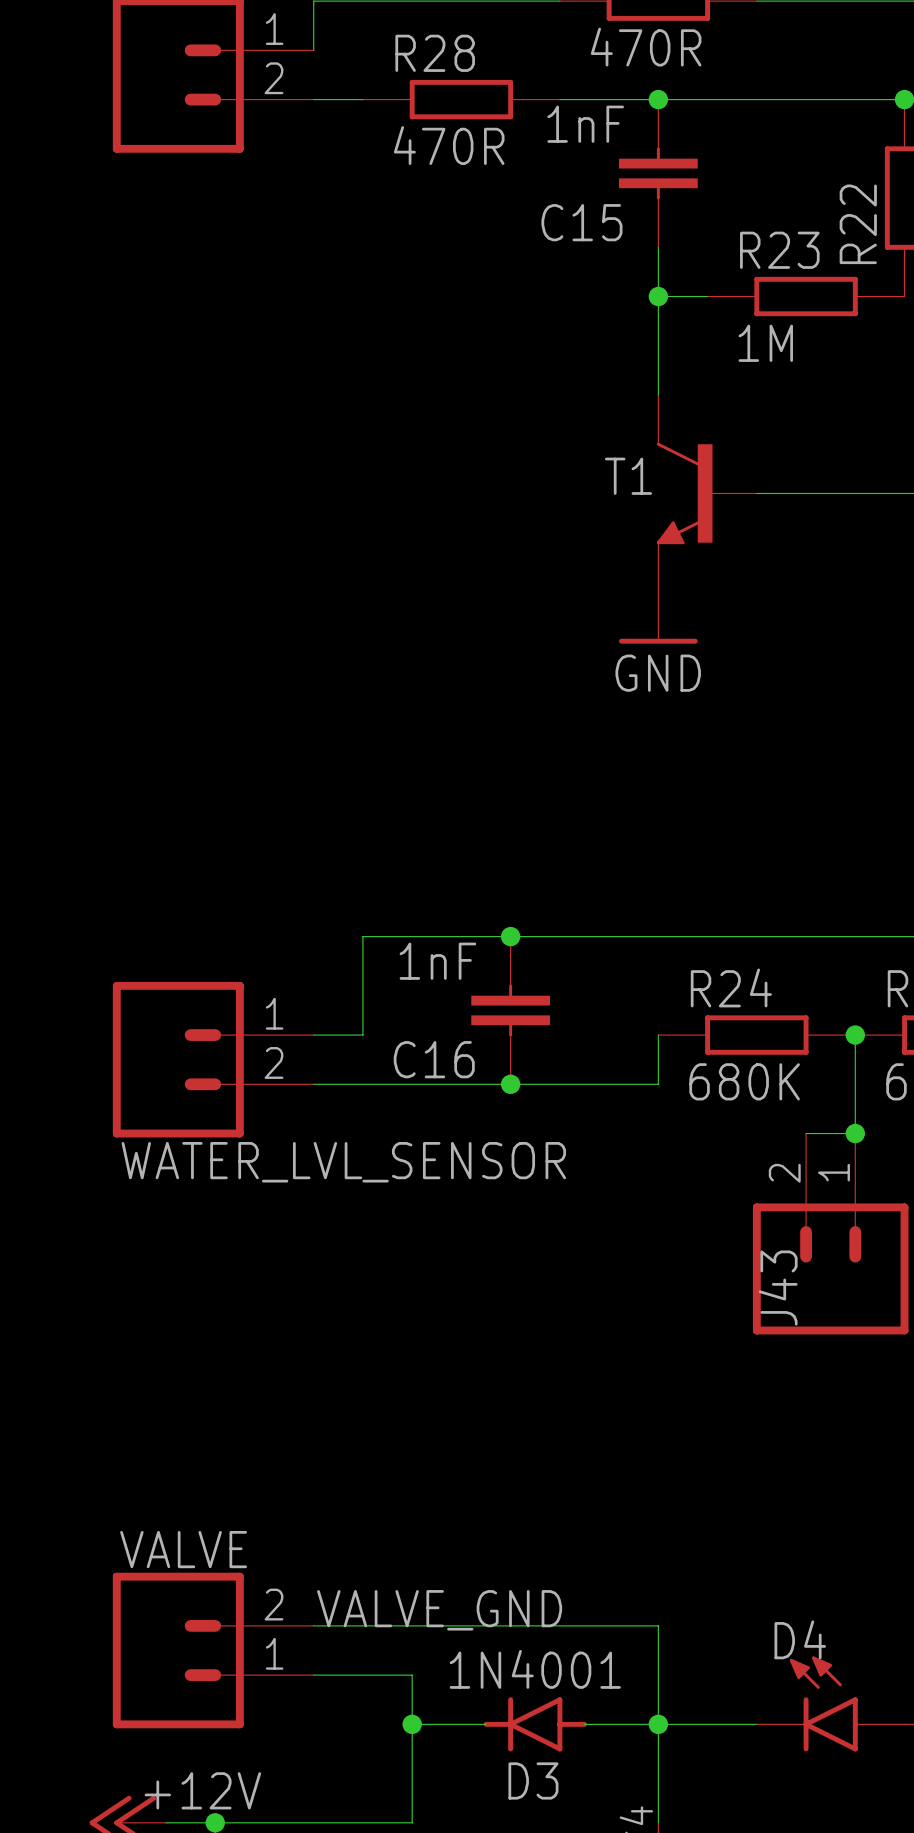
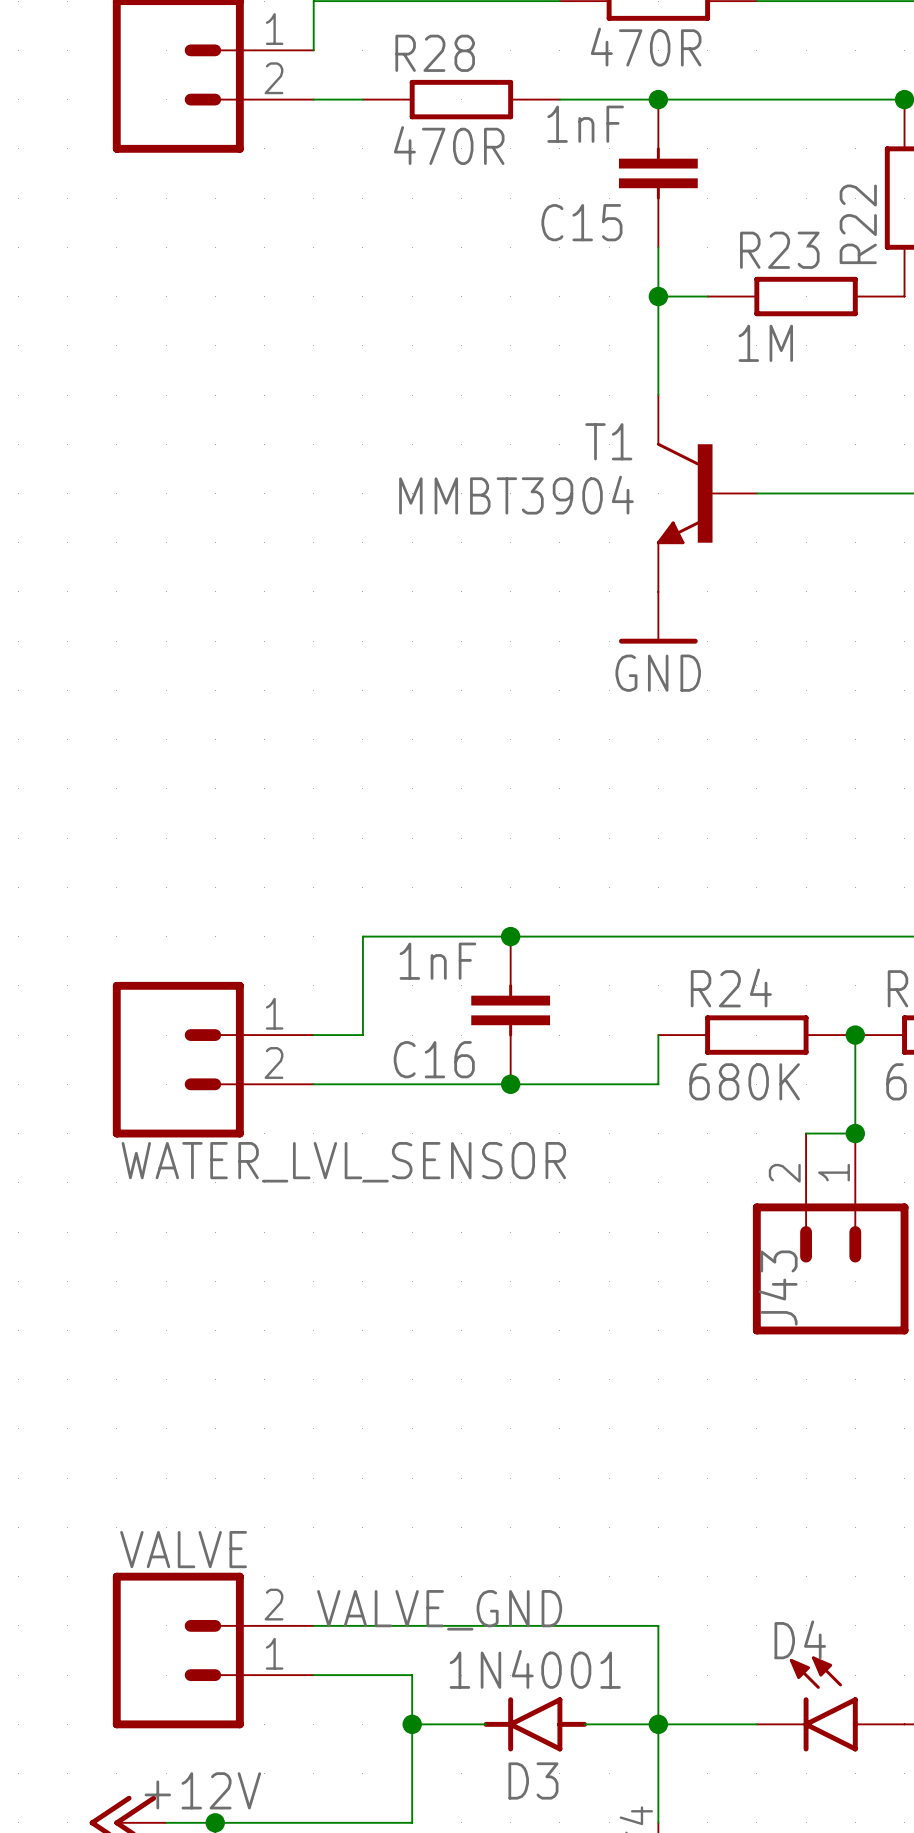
T1 name position: T1 (628, 476) -> T1 (608, 441)
T1 value: none -> MMBT3904 (516, 495)

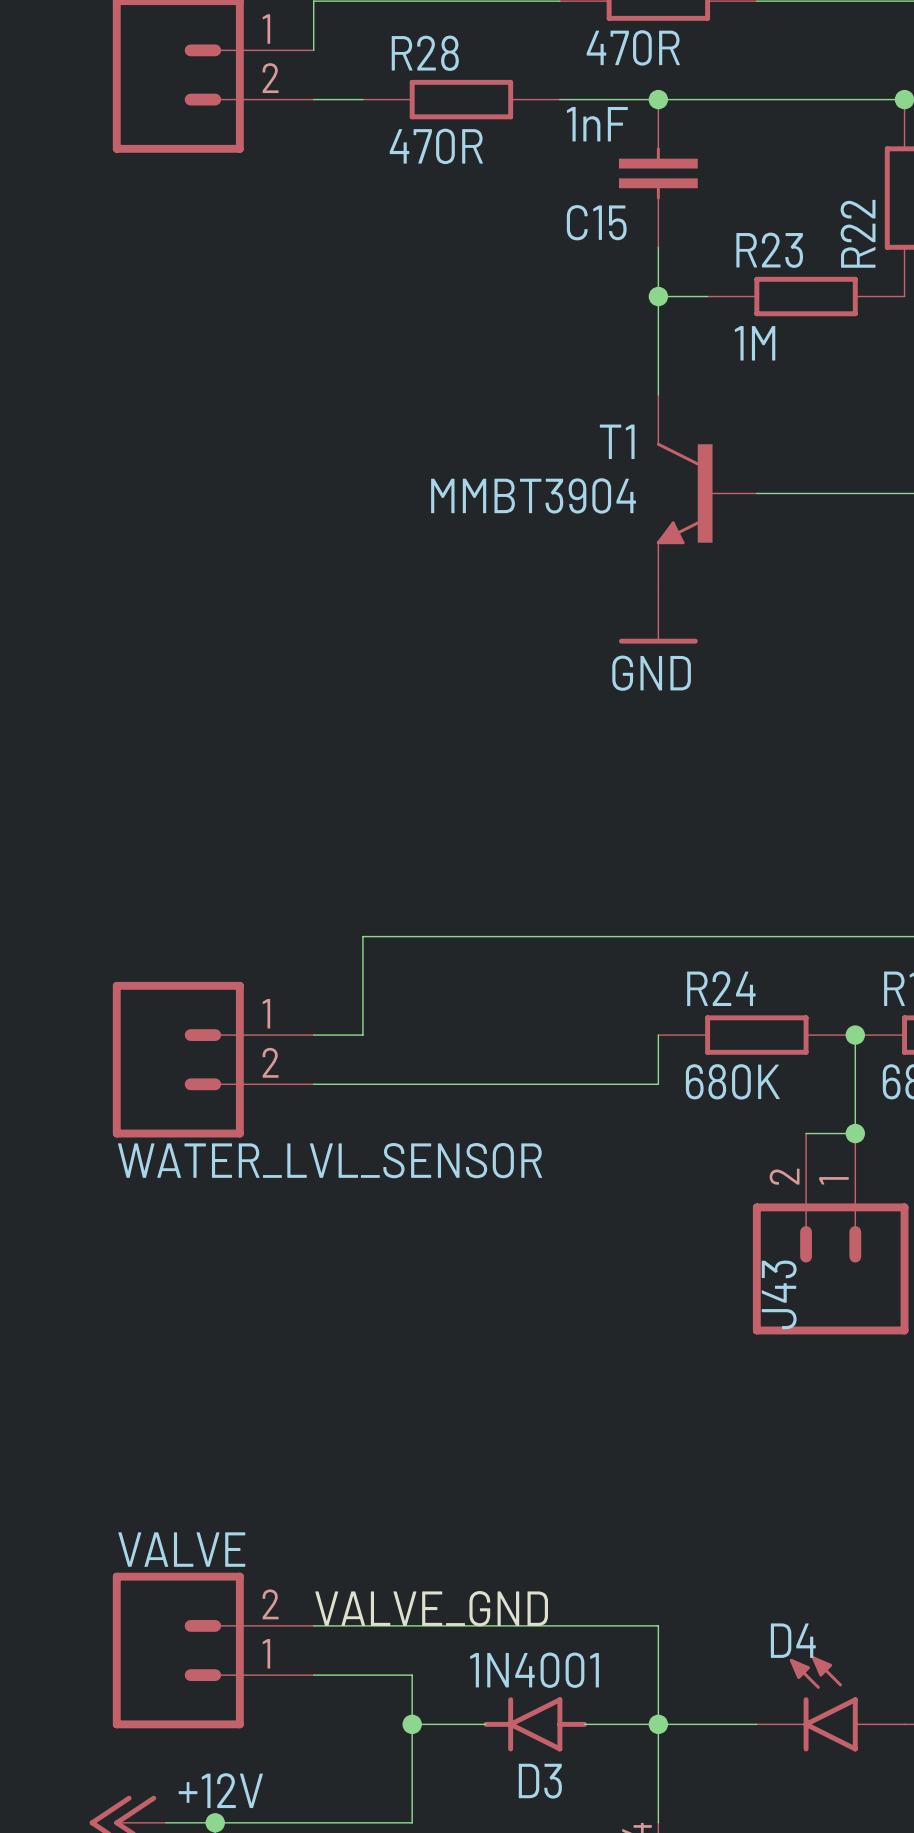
junction: (510, 936) -> none
C16: 1nF (510, 1010) -> none
junction: (510, 1084) -> none

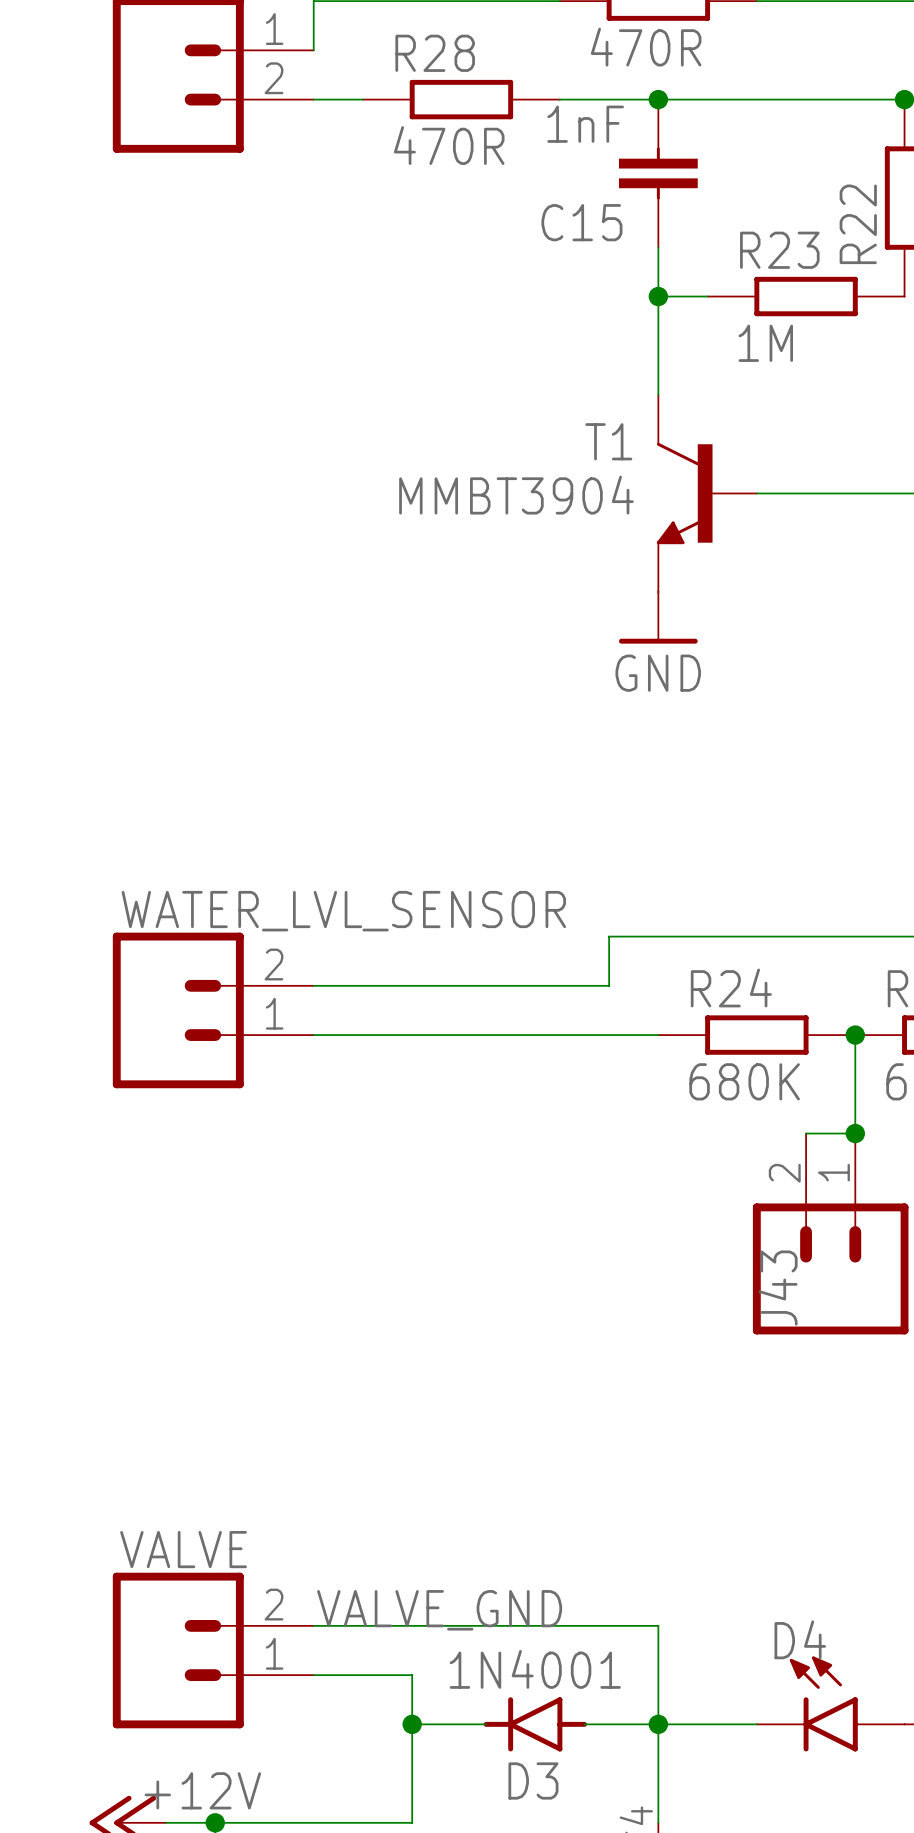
wire: (609, 936) (362, 936) (362, 1035) -> (609, 936) (609, 985) (313, 985)
WATER_LVL_SENSOR: none -> (213, 1010)
wire: (658, 1035) (658, 1084) (313, 1084) -> (658, 1035) (362, 1035)
WATER_LVL_SENSOR: (213, 1059) -> none

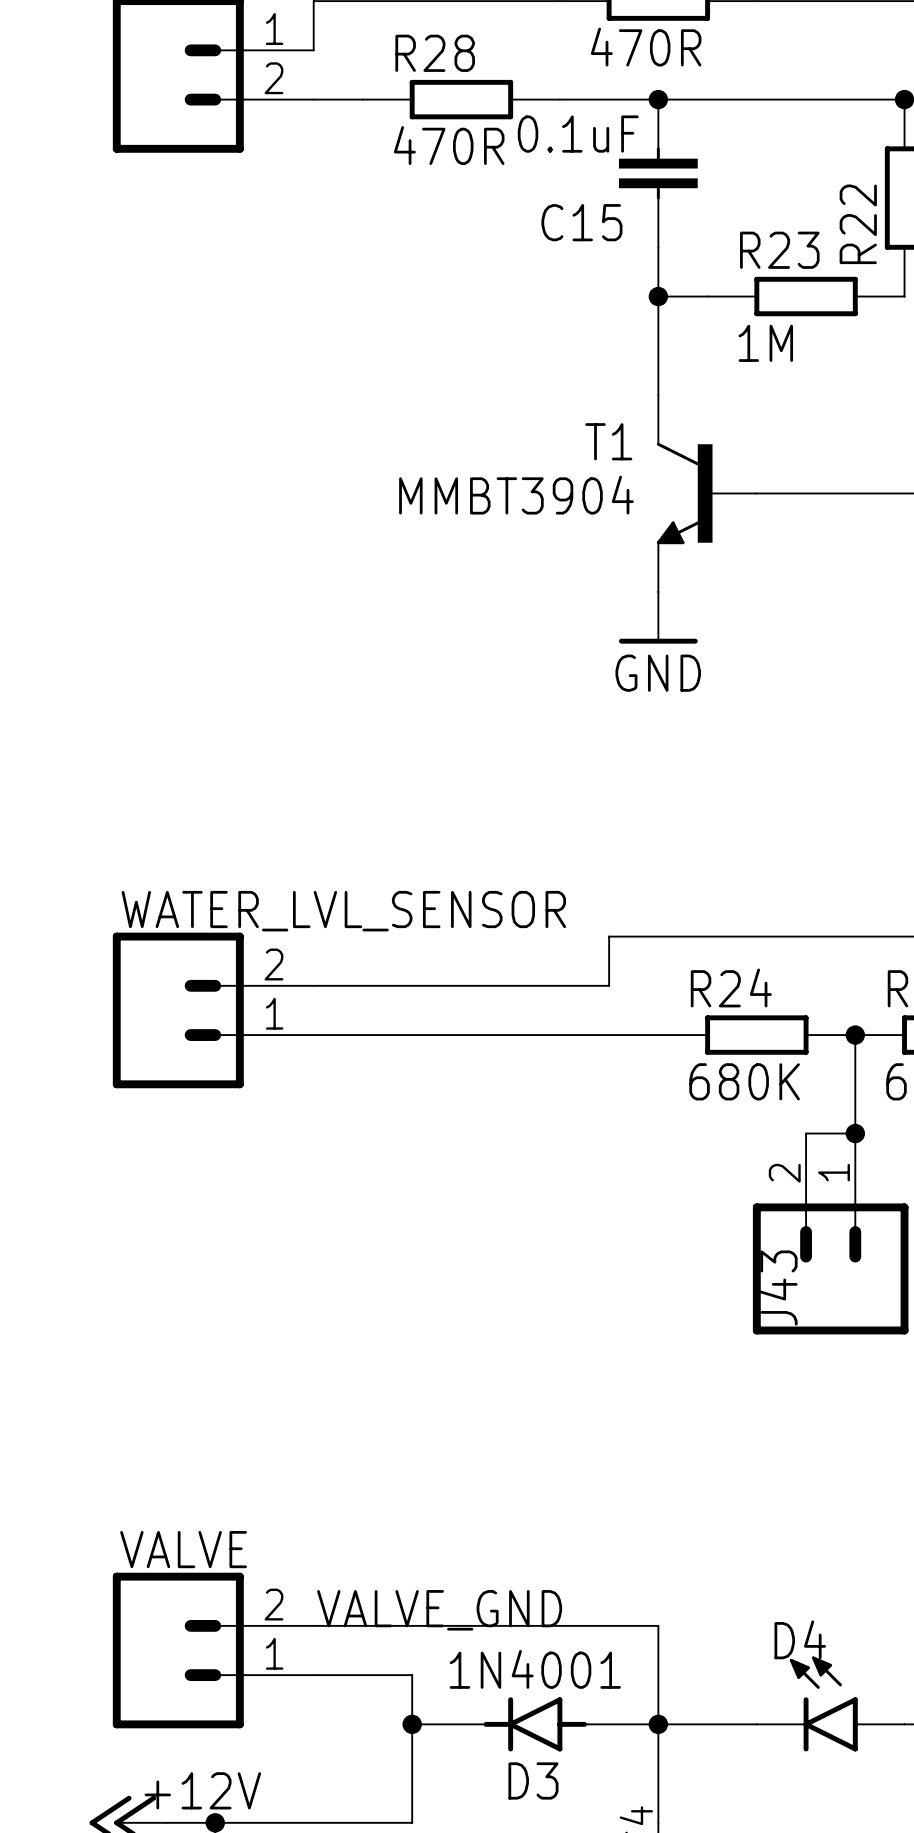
C15 value: 1nF (585, 124) -> 0.1uF (578, 134)

